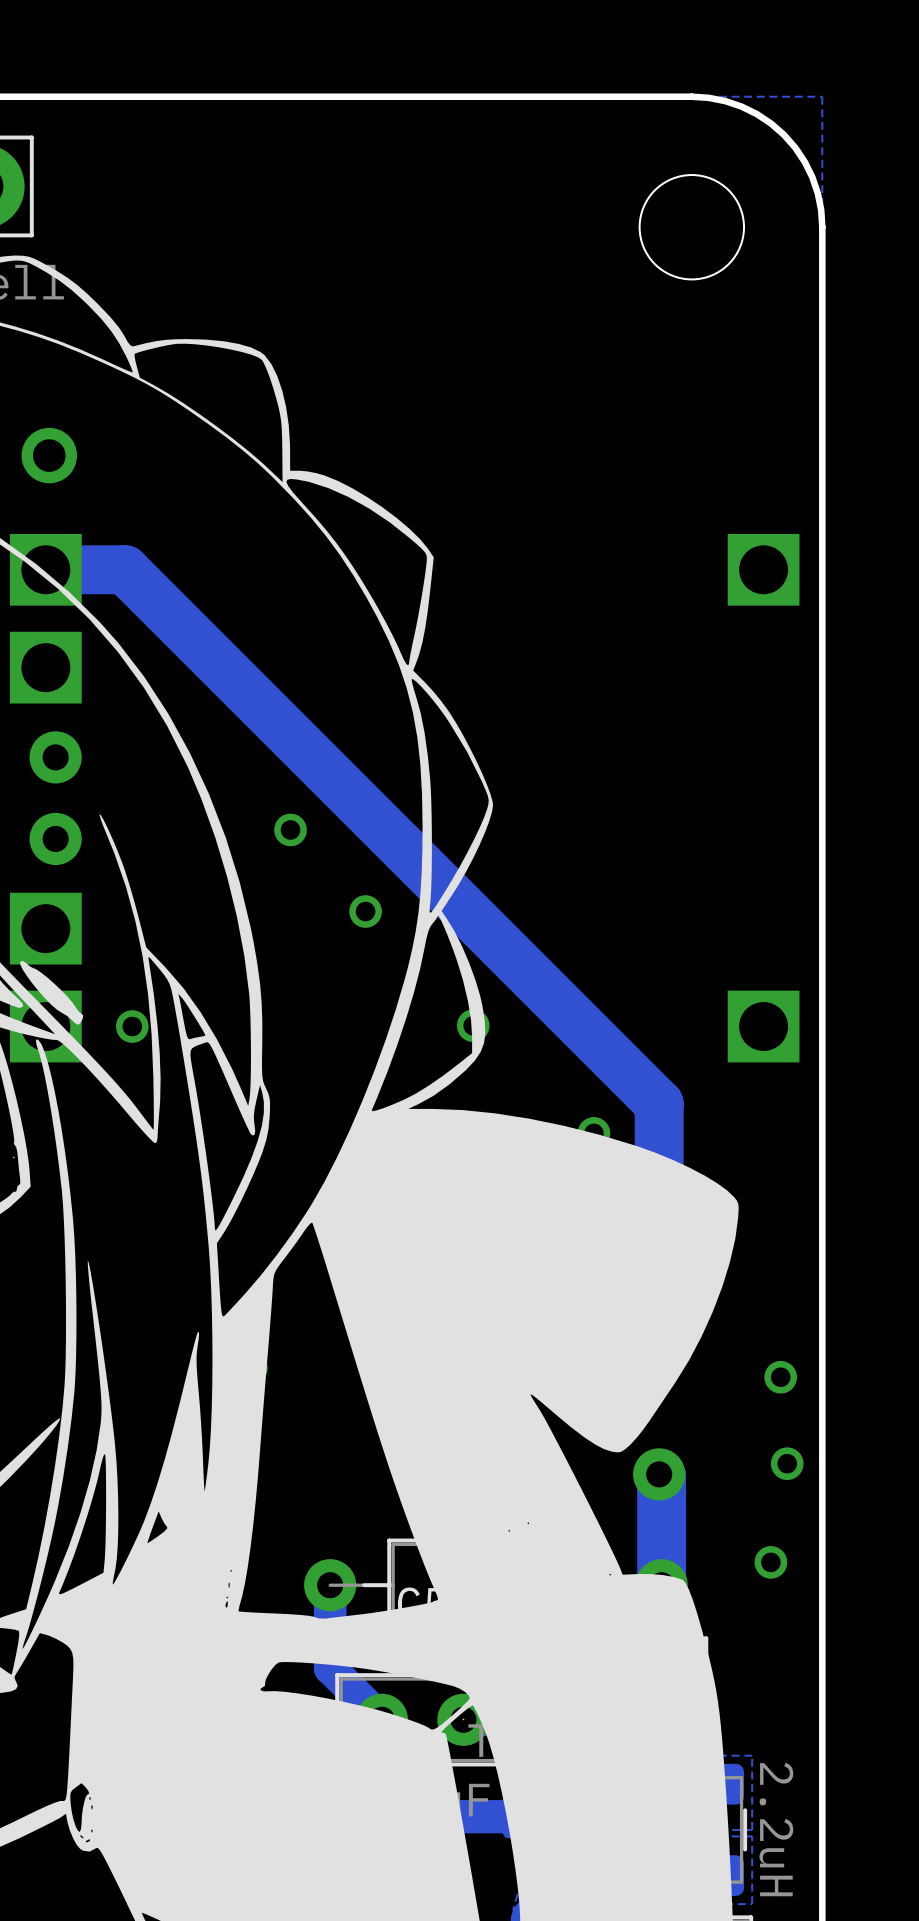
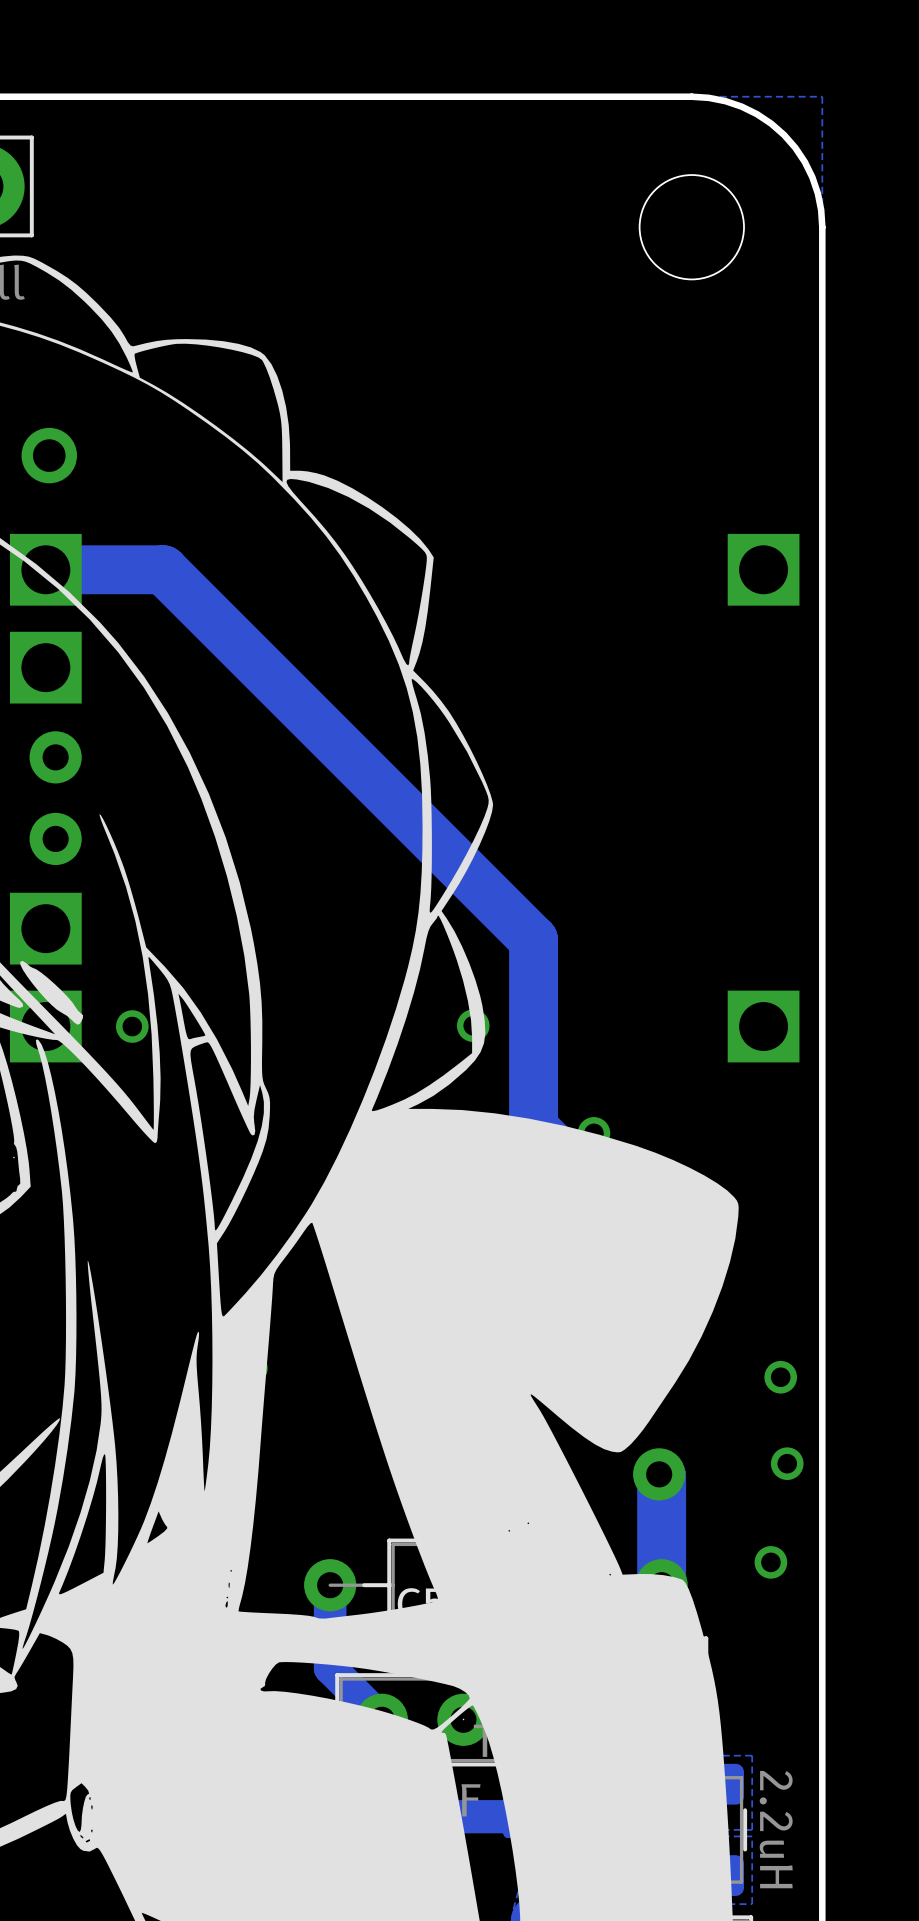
track: (124, 569) (659, 1104) (659, 1225) -> (124, 569) (163, 569) (533, 940) (533, 1127) (631, 1225) (659, 1225) (659, 1320)
via: (290, 829) -> none
via: (365, 911) -> none

